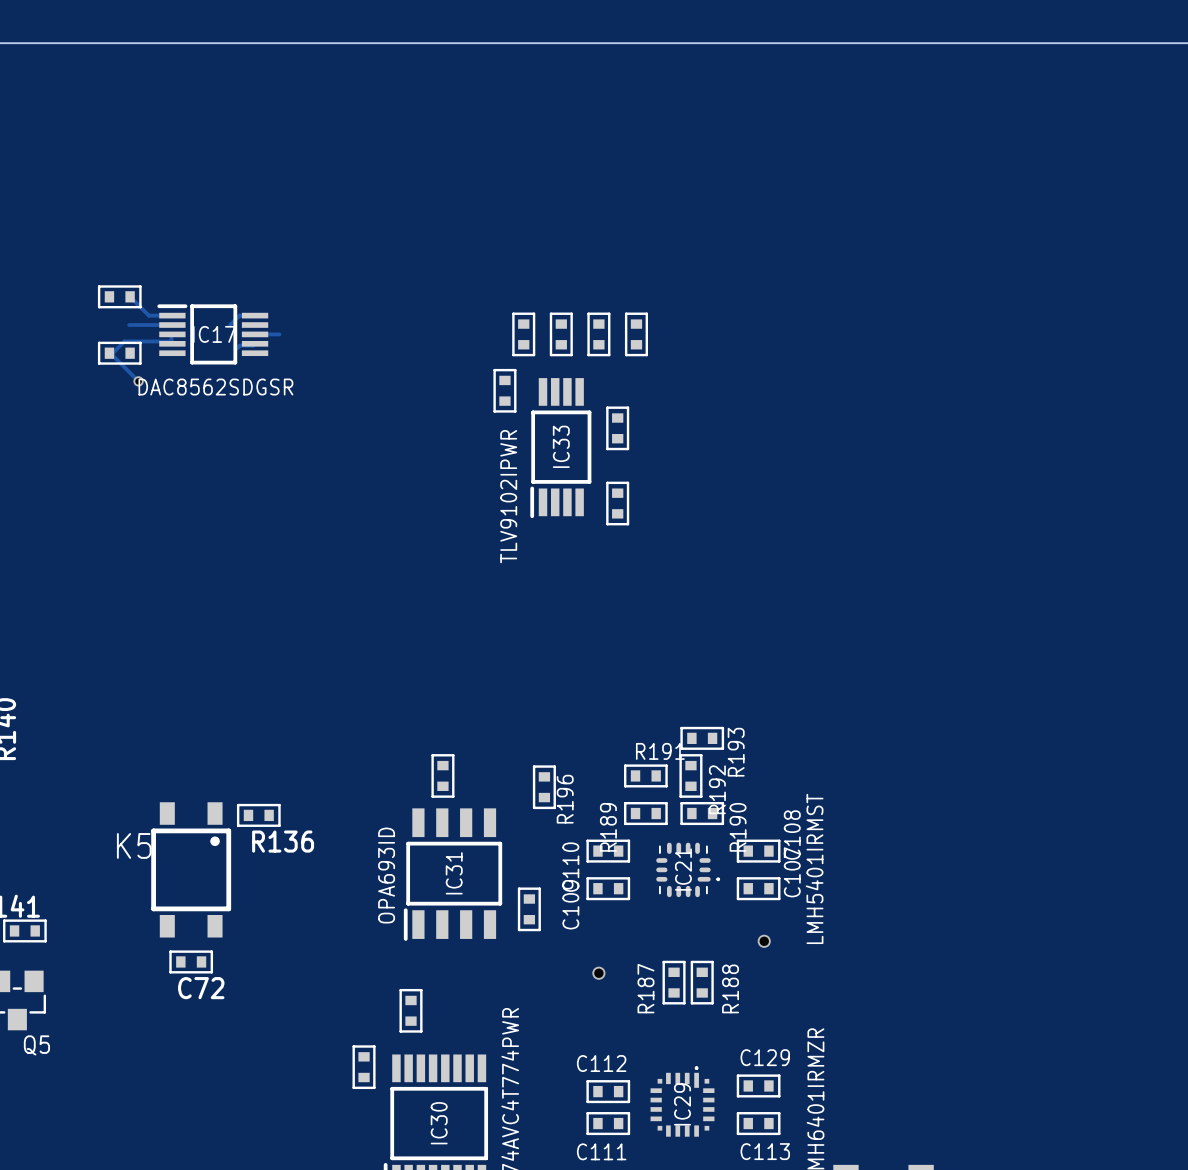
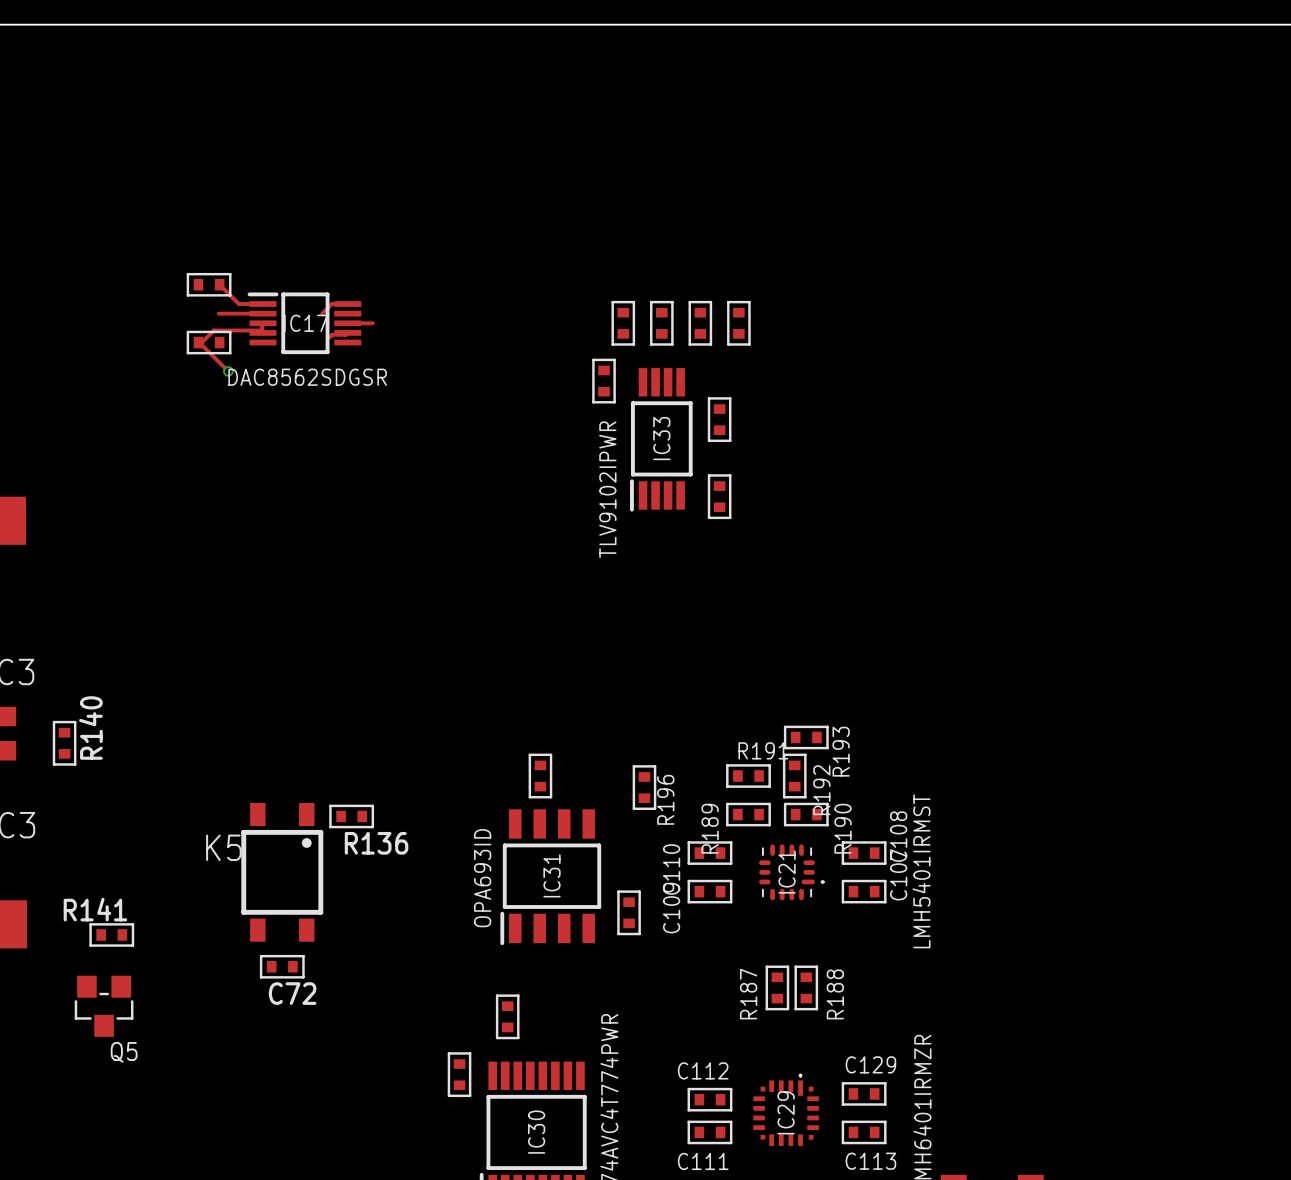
via: (764, 941) -> none
via: (598, 973) -> none

